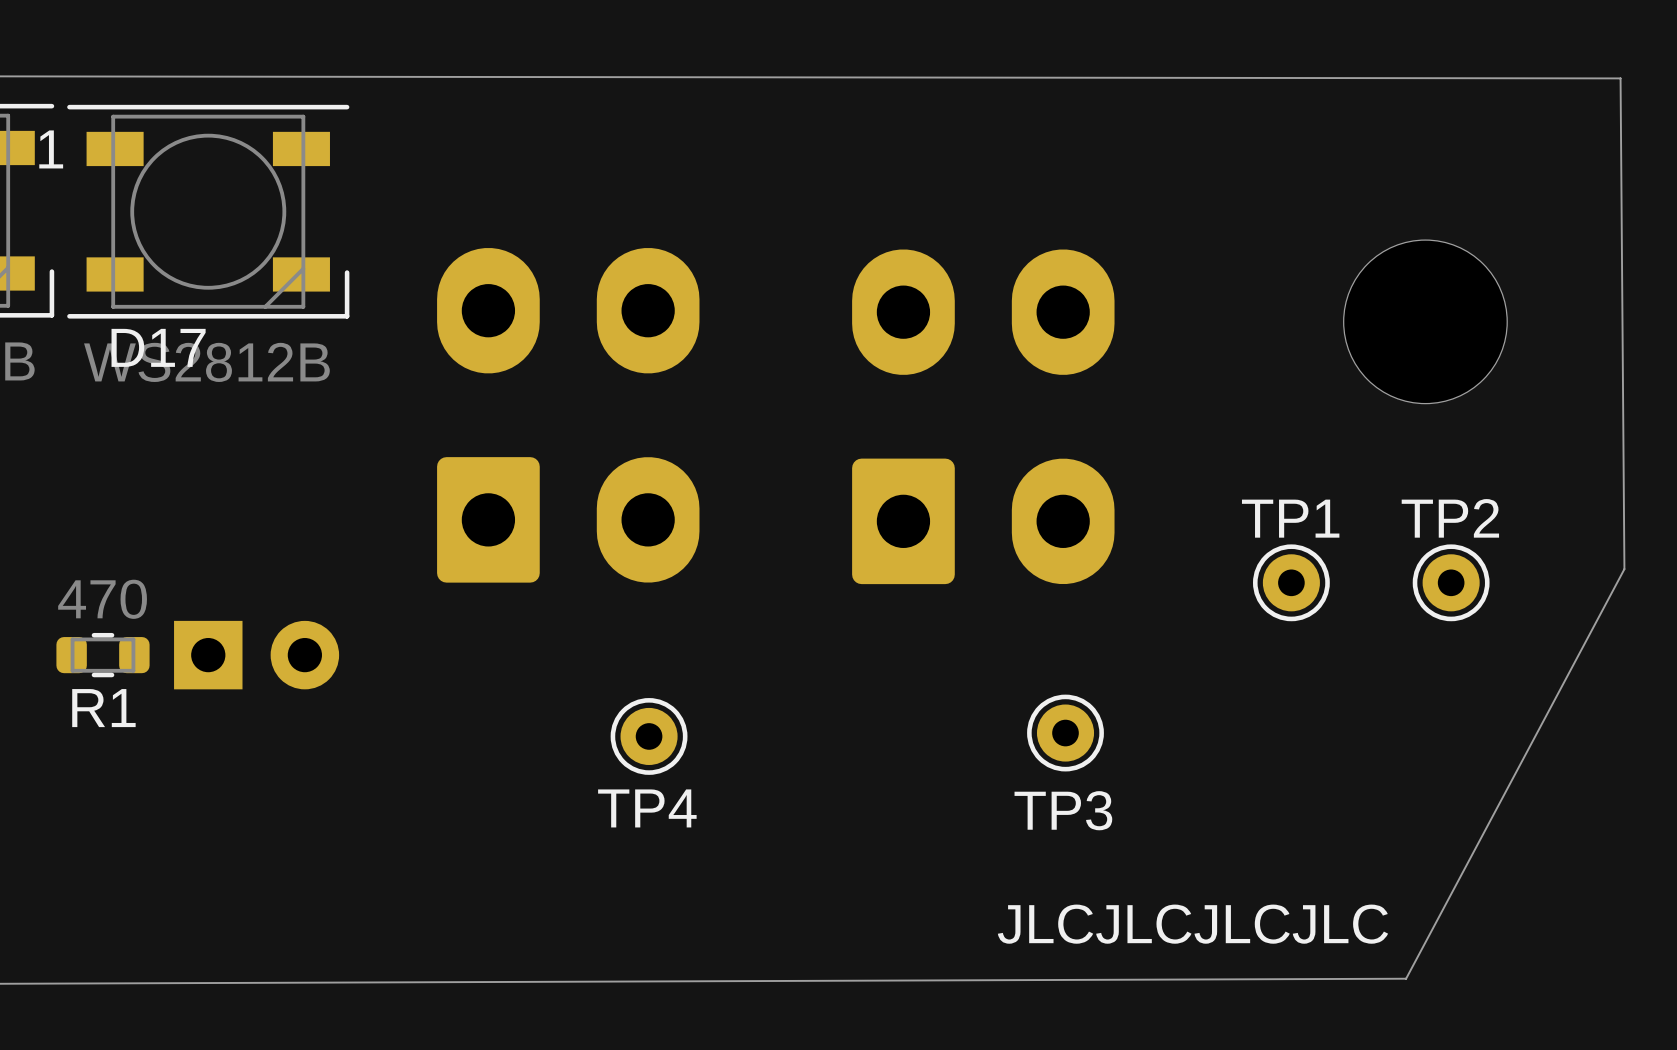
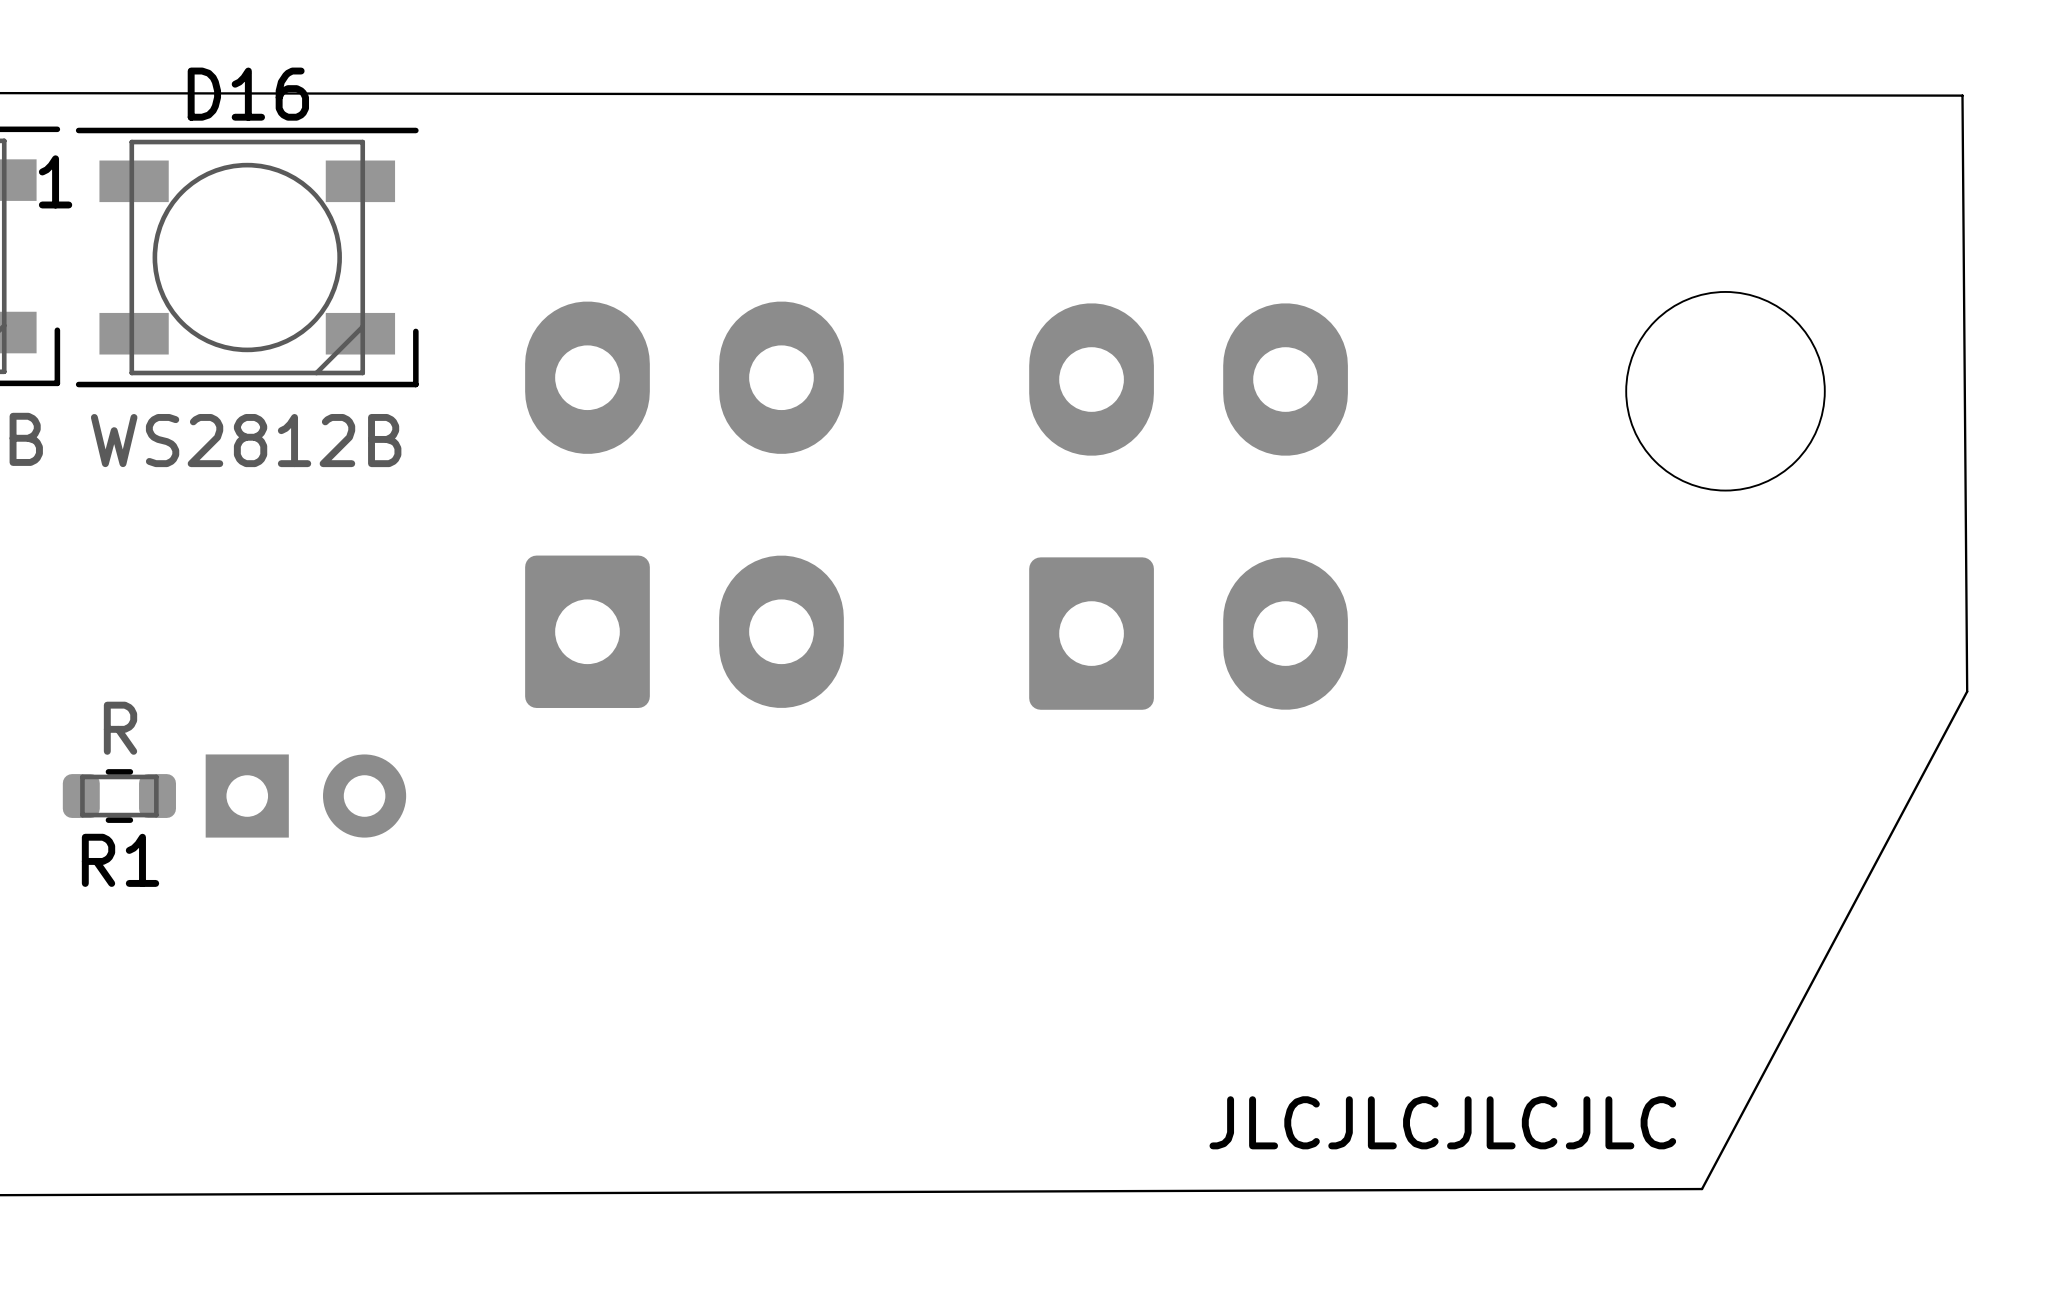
D17 name: D17 (158, 347) -> D16 (248, 94)
part: (1291, 582) -> none
part: (1451, 582) -> none
R1 value: 470 (102, 599) -> R (120, 728)
part: (1065, 733) -> none
part: (649, 736) -> none

